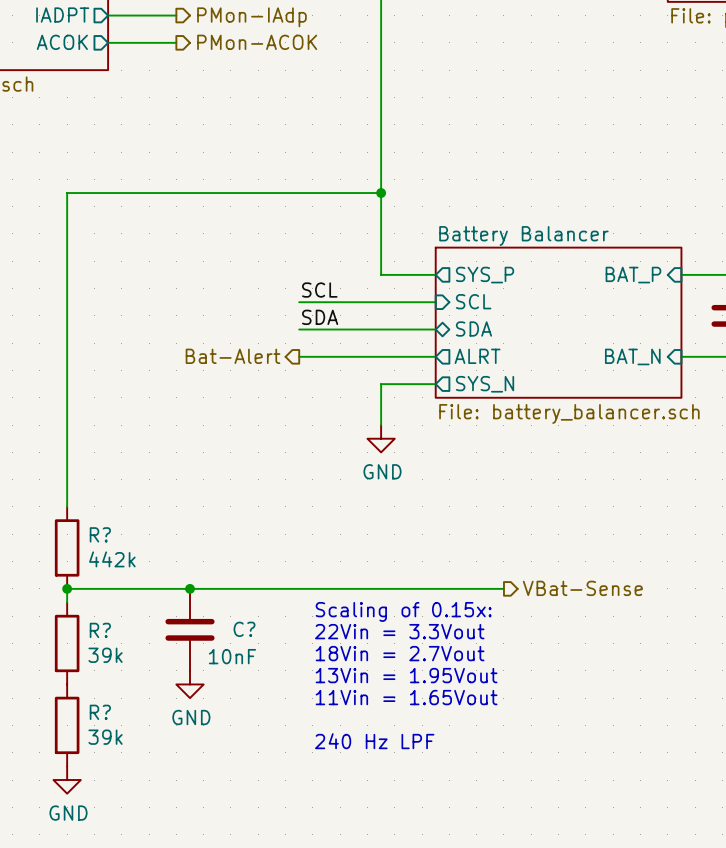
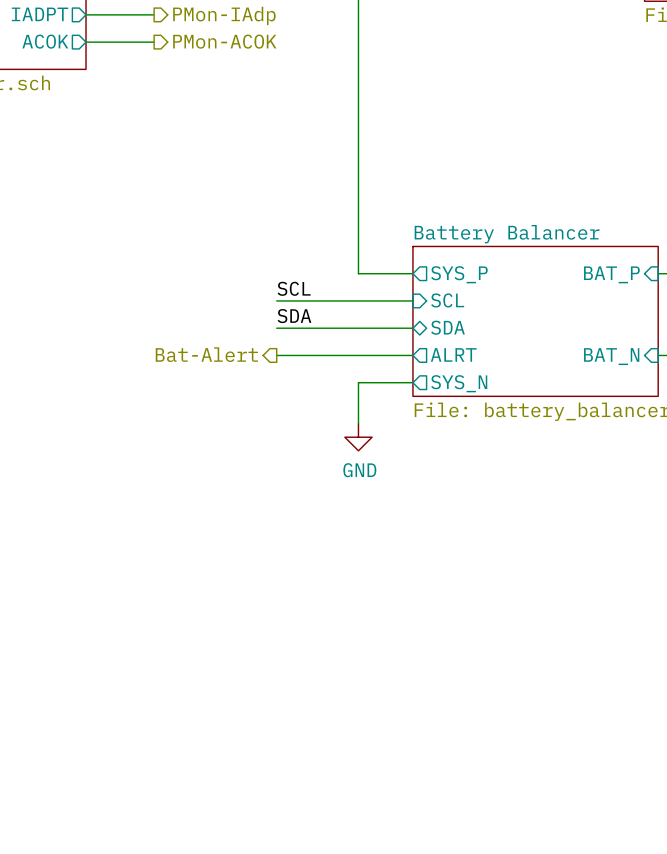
wire: (381, 193) (67, 193) (67, 506) -> none
junction: (381, 193) -> none
R?: 442k (67, 547) -> none
junction: (67, 588) -> none
junction: (190, 588) -> none
wire: (503, 588) (67, 588) (67, 602) -> none
hierarchical label: VBat-Sense (582, 588) -> none
text: Scaling of 0.15x: (403, 611) -> none
C?: 10nF (190, 629) -> none
text: 22Vin = 3.3Vout (399, 631) -> none
R?: 39k (67, 643) -> none
text: 18Vin = 2.7Vout (400, 653) -> none
text: 13Vin = 1.95Vout (406, 675) -> none
power symbol: GND (190, 684) -> none
text: 11Vin = 1.65Vout (406, 697) -> none
R?: 39k (67, 725) -> none
text: 240 Hz LPF (374, 741) -> none
power symbol: GND (67, 780) -> none

